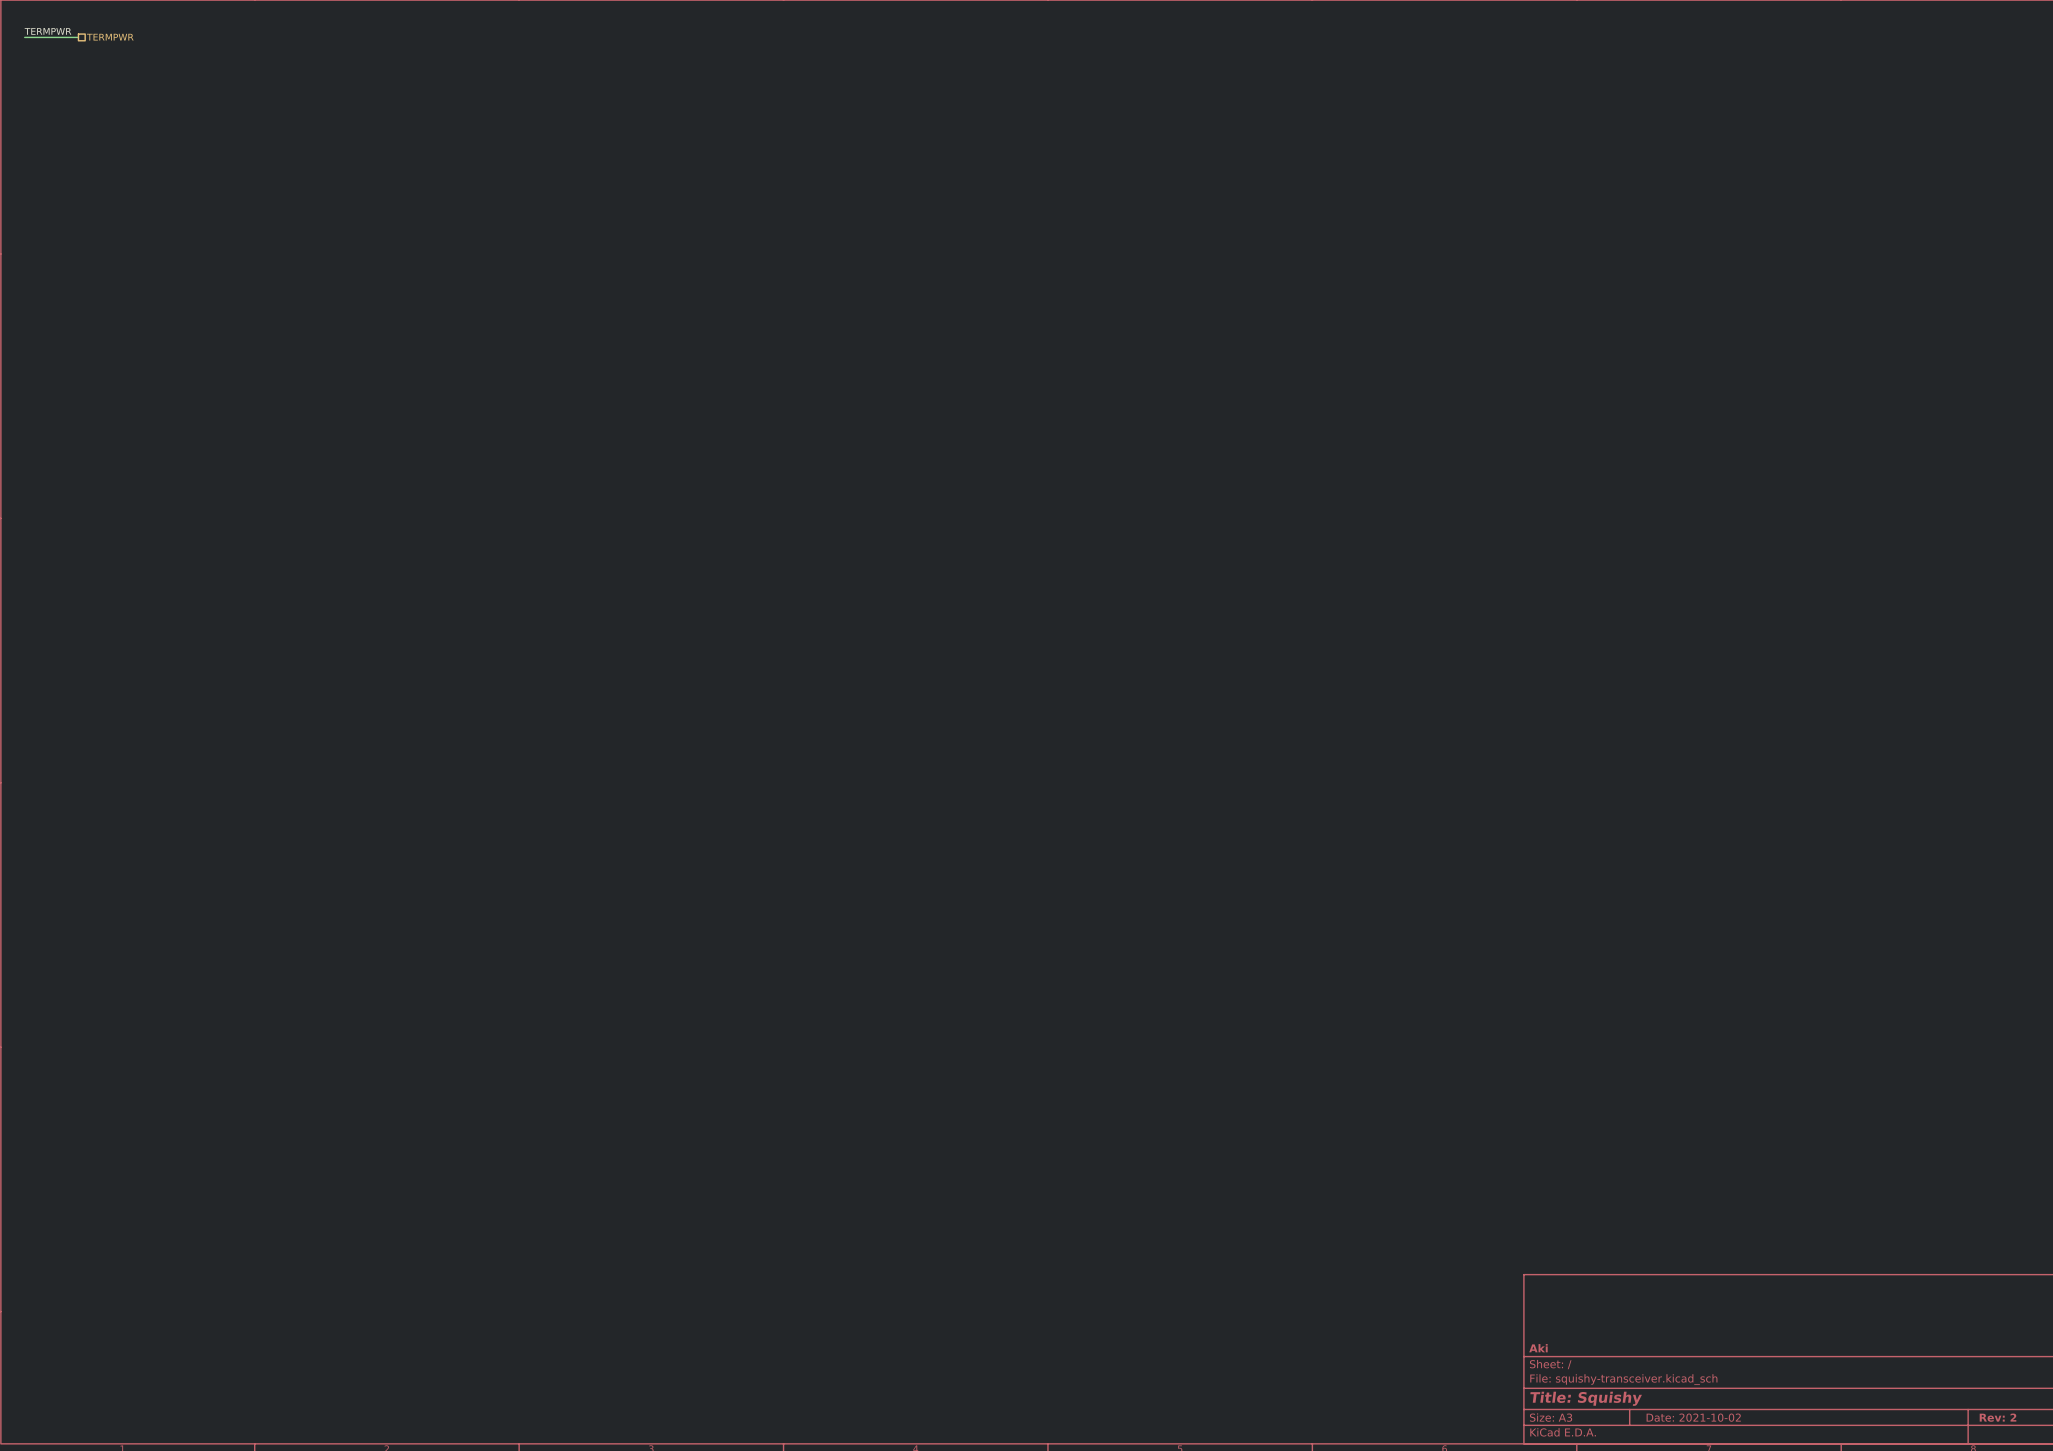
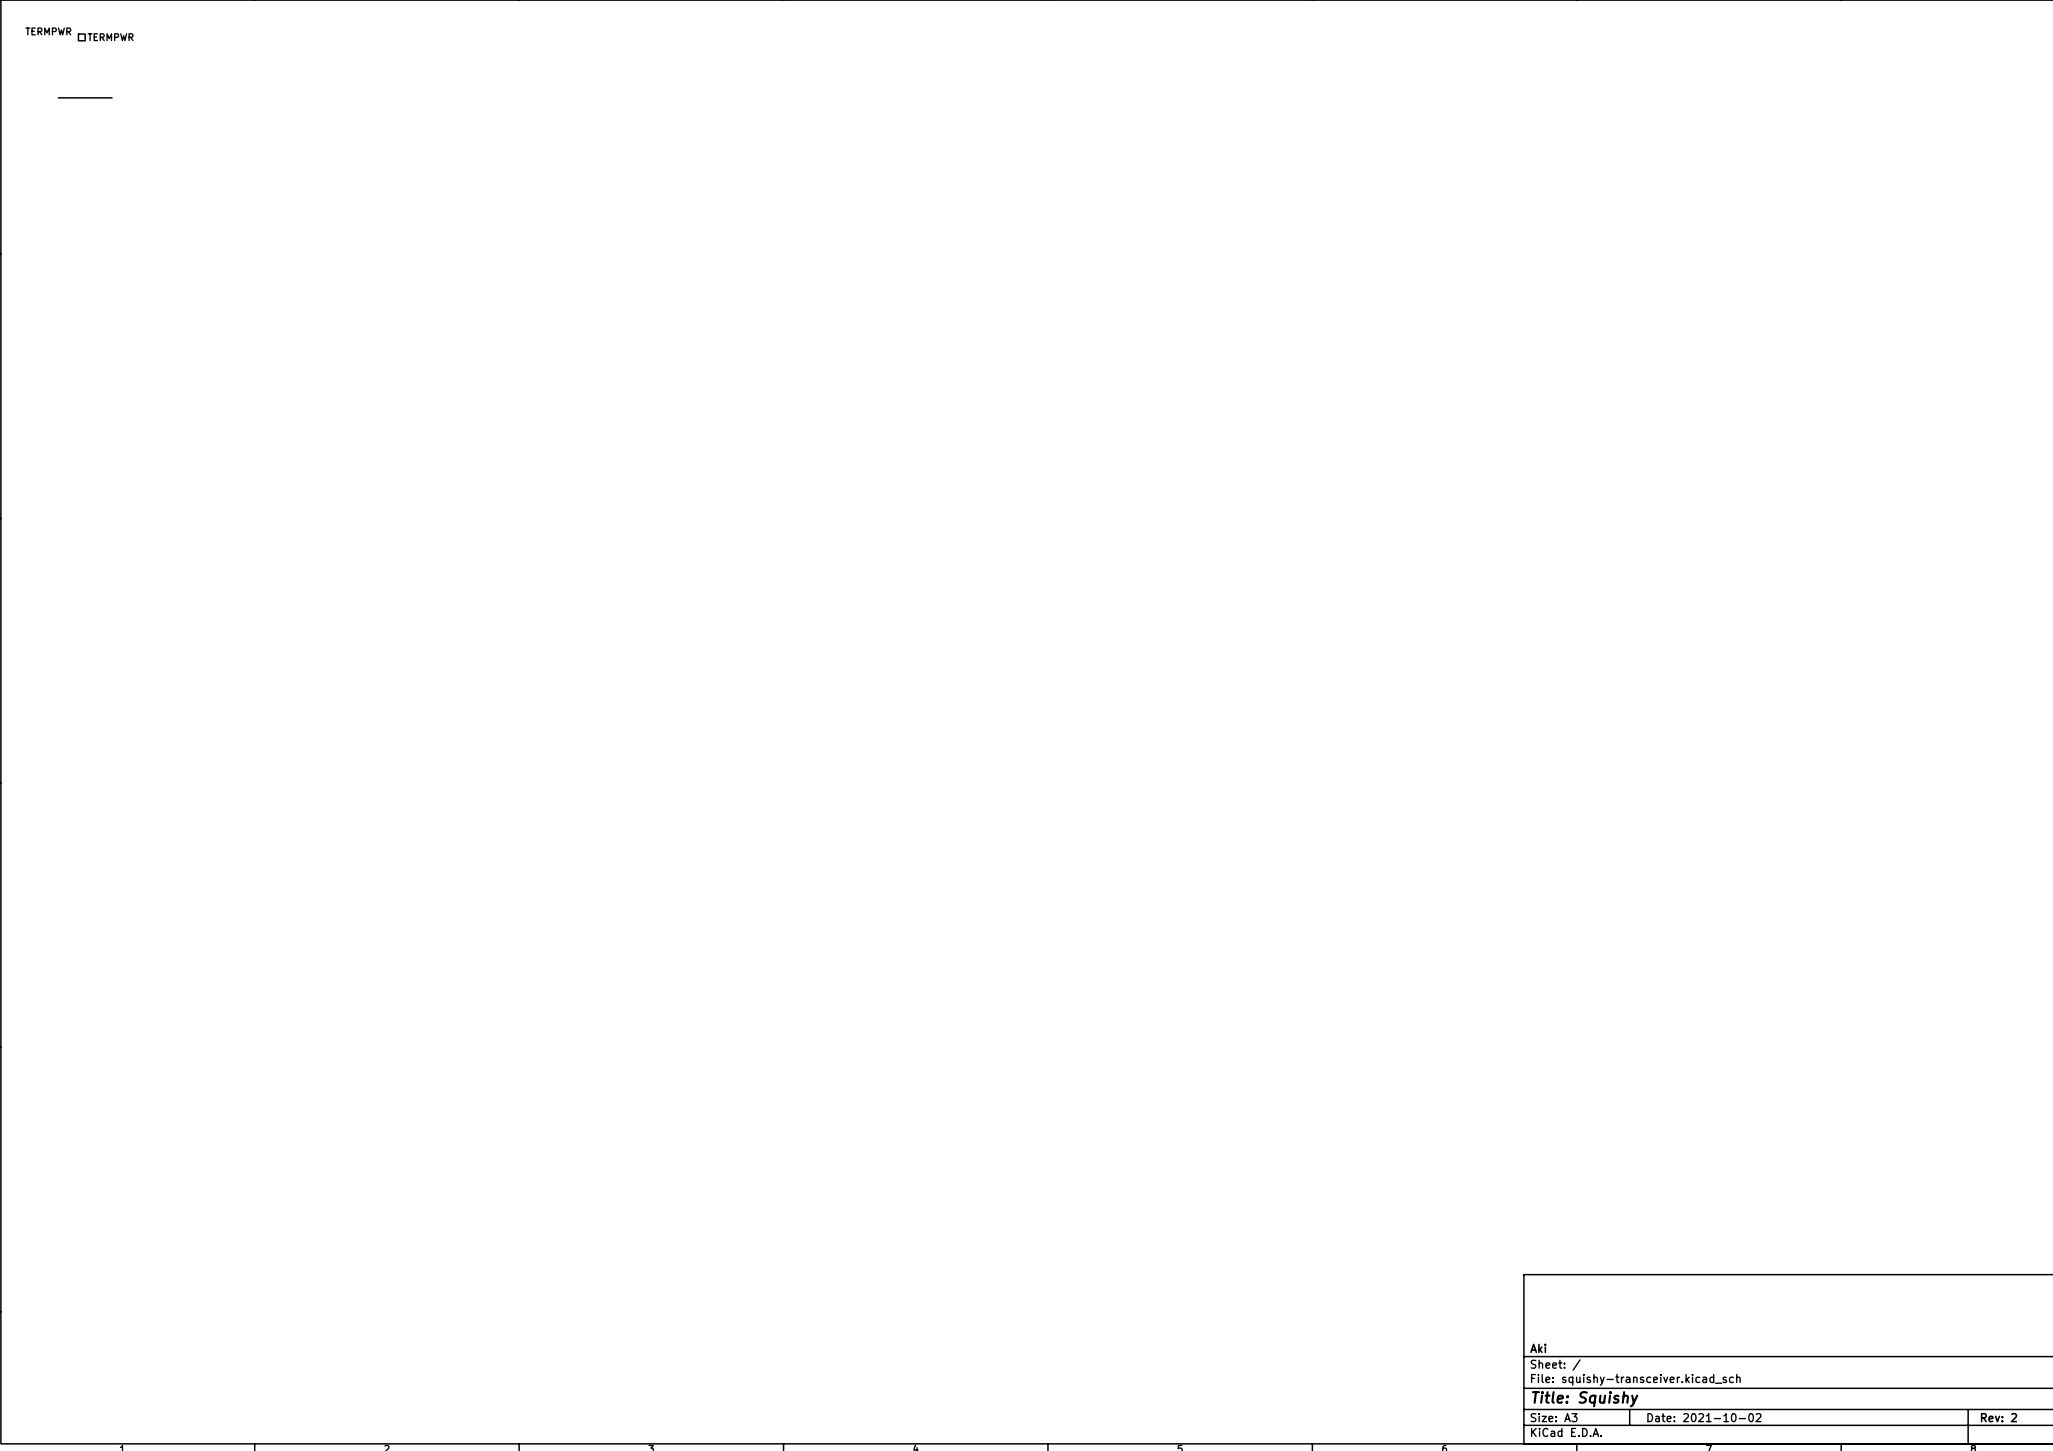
wire: (24, 37) (78, 37) -> (58, 97) (112, 97)

